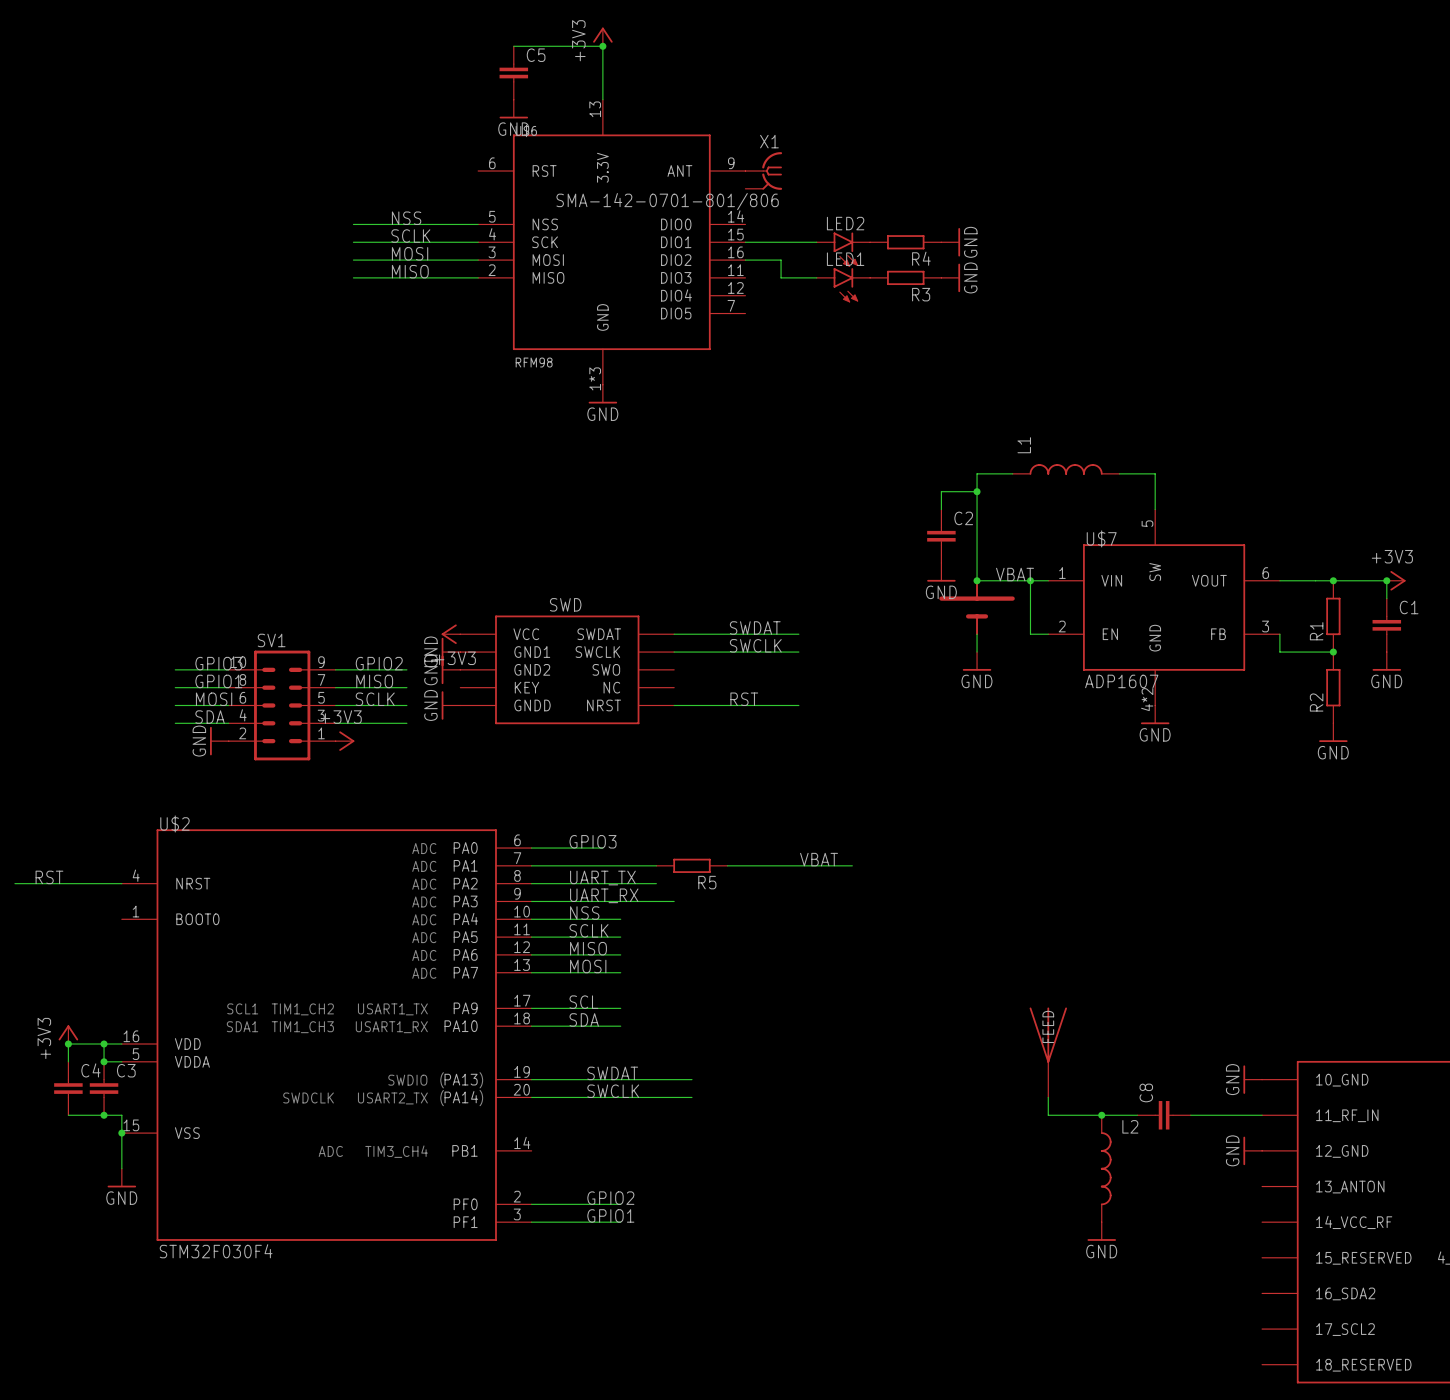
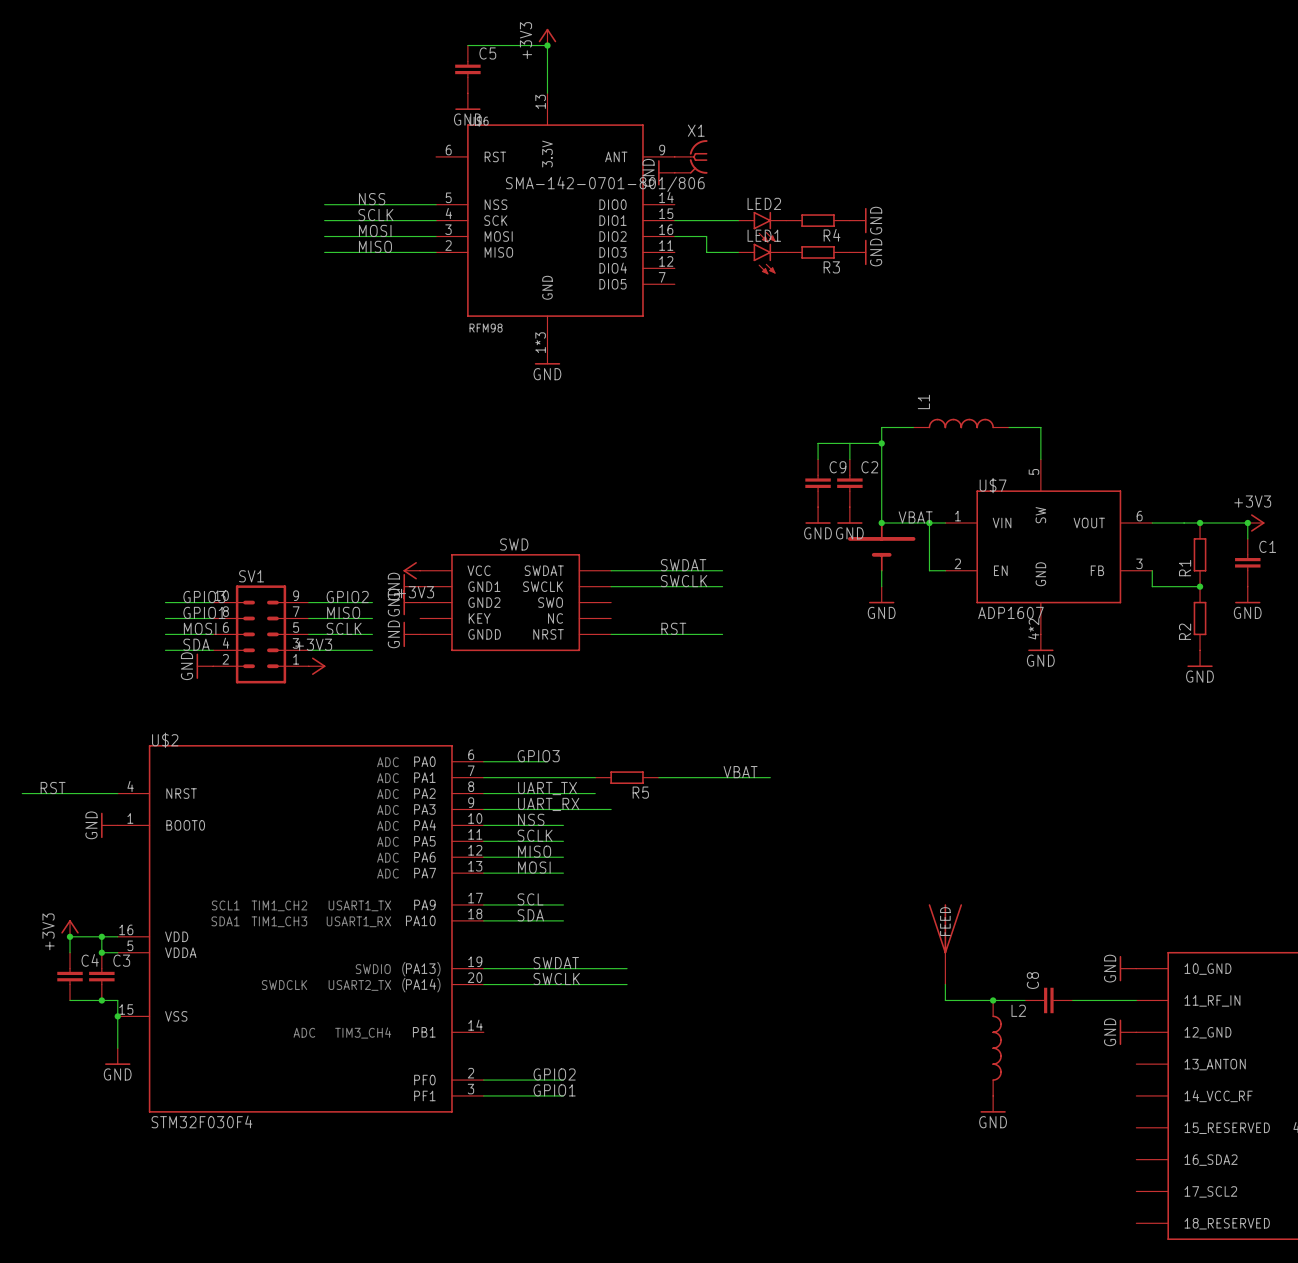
power symbol: none -> GND (666, 172)
wire: none -> (849, 443) (818, 443) (818, 459)
C9: none -> (818, 483)
power symbol: none -> GND (818, 515)
power symbol: none -> GND (109, 825)

